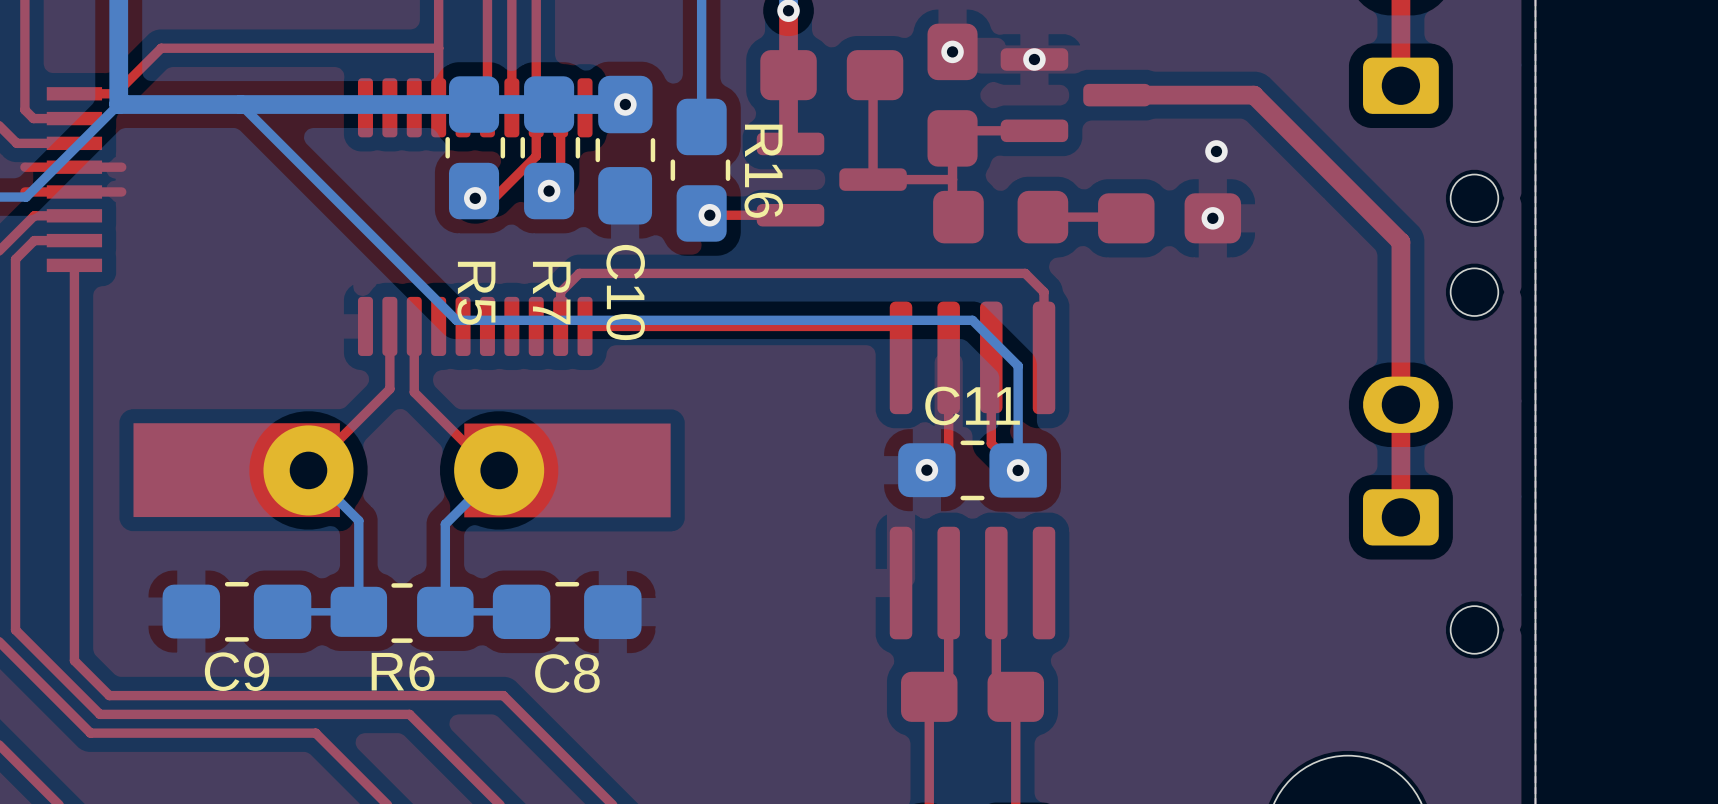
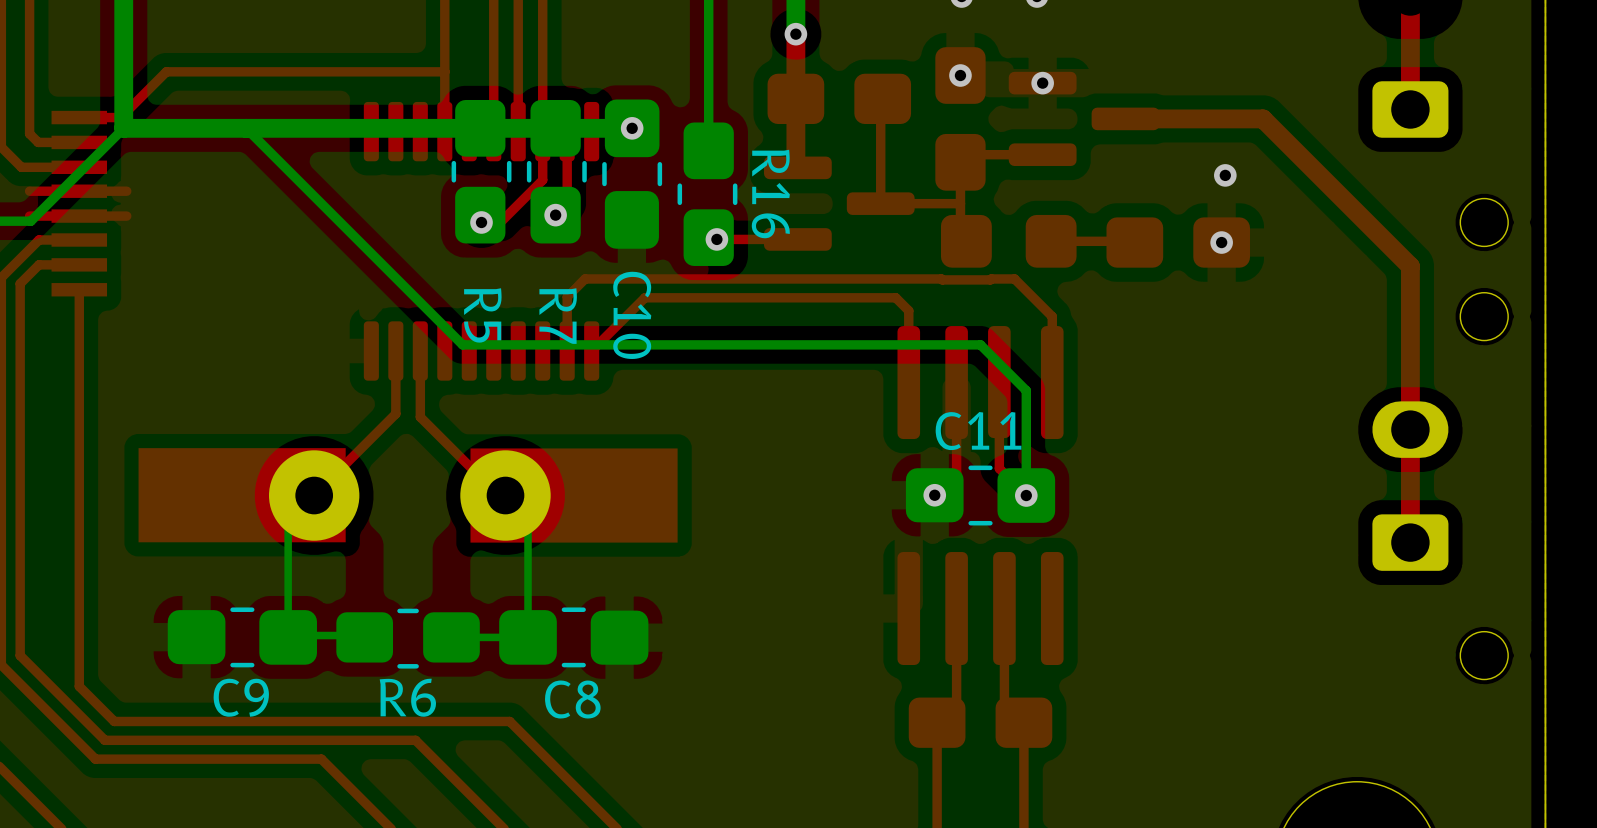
top track: (638, 273) (579, 273) (560, 292) -> (644, 297) (591, 351)
top track: (1025, 273) (888, 273) -> (908, 351) (908, 310) (895, 297)
top track: none -> (1033, 297) (1014, 278) (585, 278) (567, 296) (567, 316)
top track: (901, 326) (585, 326) -> none
bottom track: (308, 470) (358, 520) (358, 611) (282, 611) -> (314, 495) (288, 521) (288, 637) (290, 635) (362, 635)
bottom track: (499, 470) (445, 524) (445, 611) -> (505, 495) (528, 518) (528, 637)

